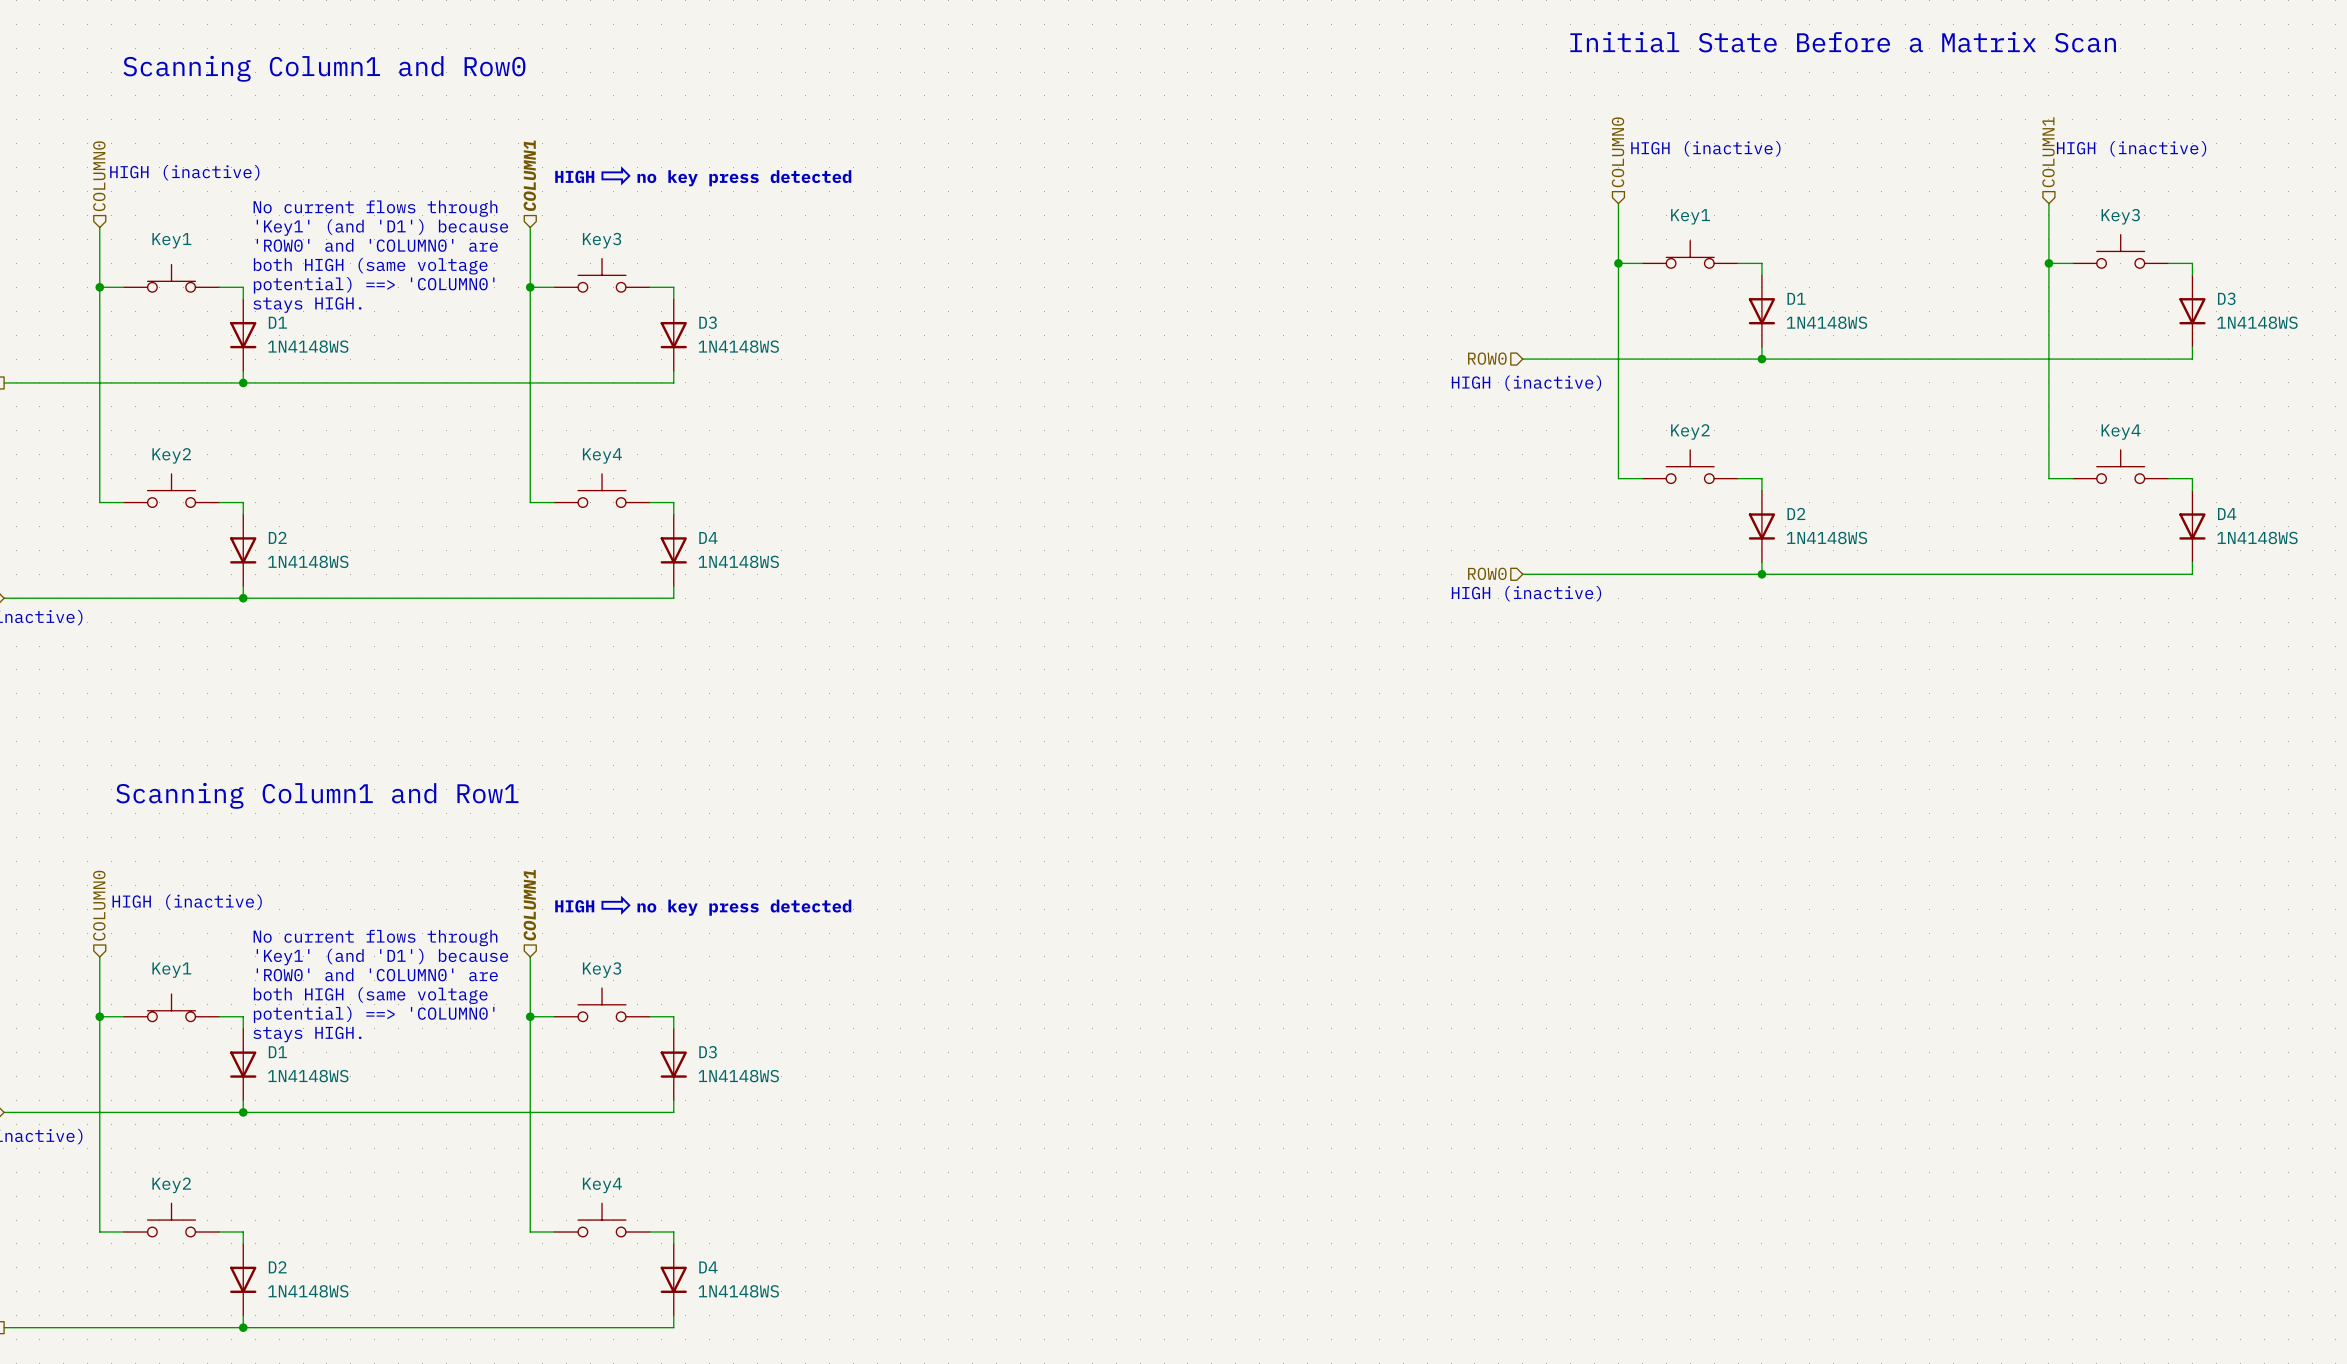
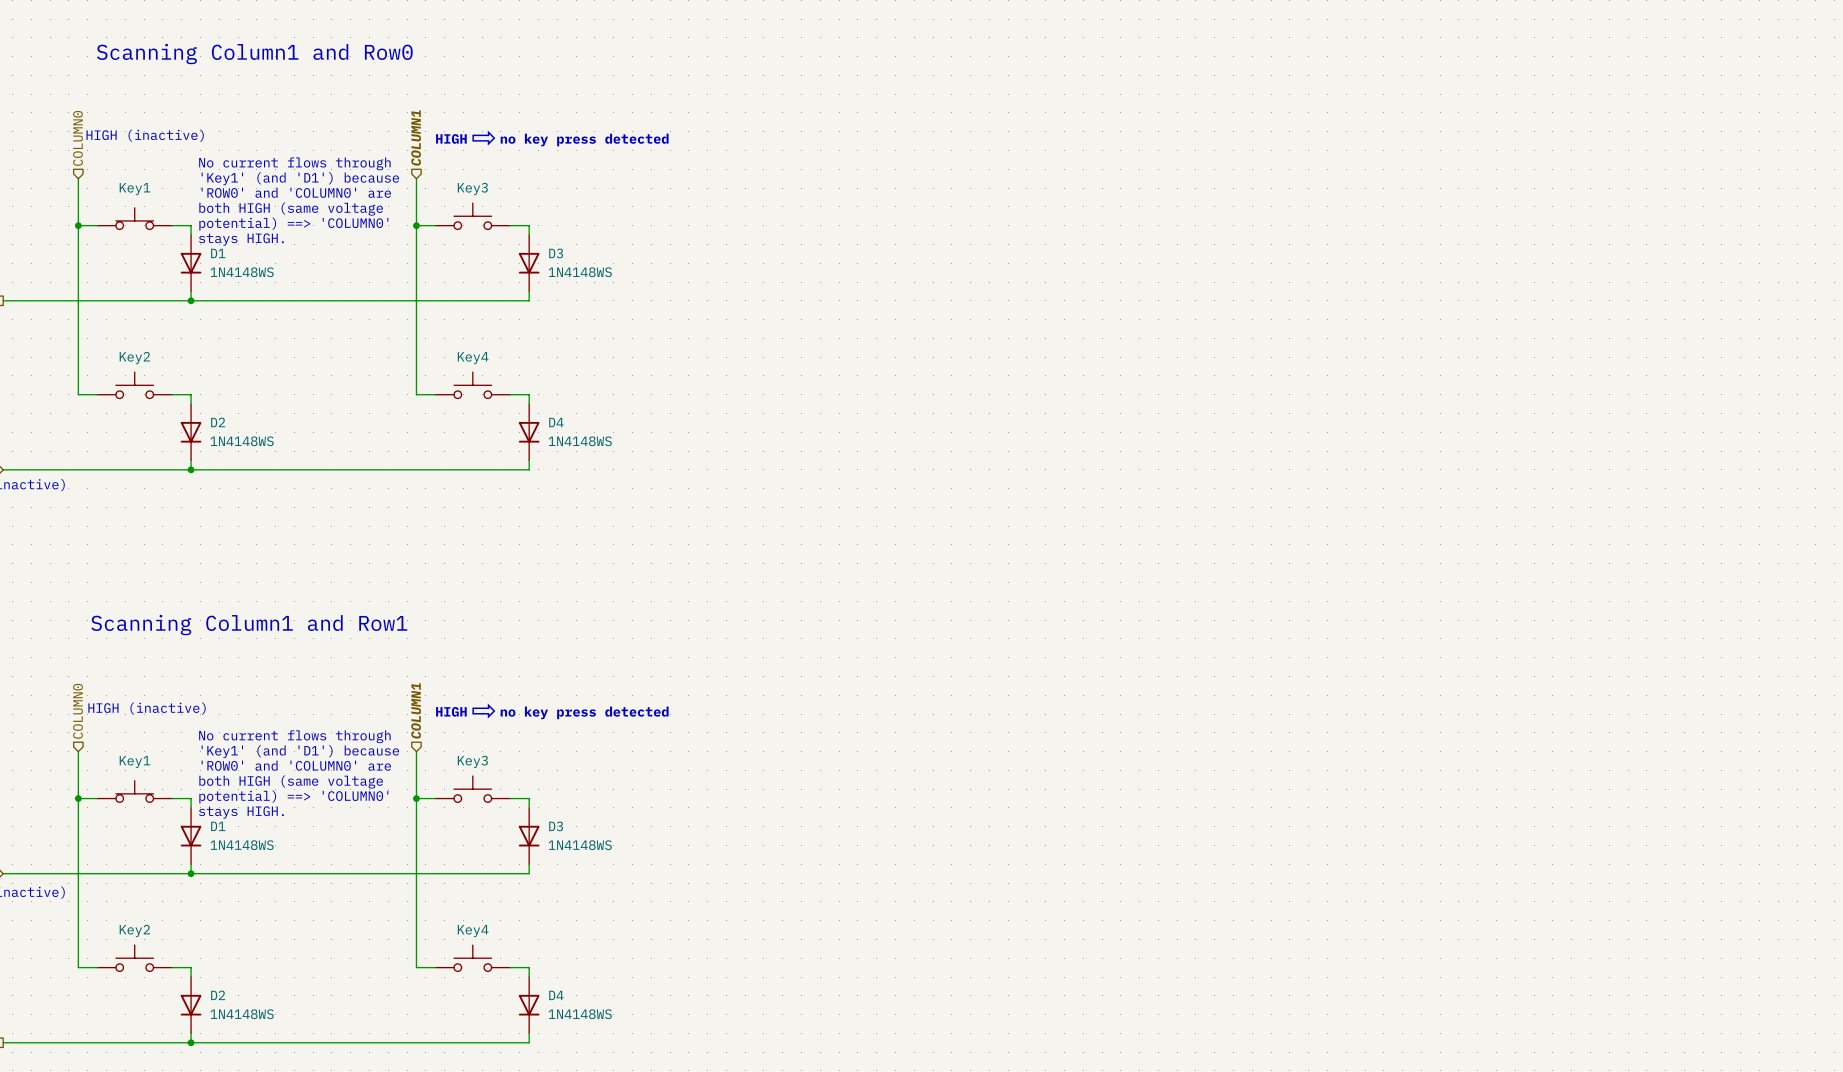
text: Initial State Before a Matrix Scan (1843, 42) -> none
text: HIGH (inactive) (1705, 148) -> none
text: HIGH (inactive) (2131, 148) -> none
hierarchical label: COLUMN0 (1618, 152) -> none
hierarchical label: COLUMN1 (2048, 152) -> none
wire: (1618, 203) (1618, 478) (1642, 478) -> none
wire: (2048, 203) (2048, 478) (2072, 478) -> none
Key3: (2120, 251) -> none
Key1: (1690, 254) -> none
wire: (1618, 263) (1642, 263) -> none
junction: (1618, 263) -> none
wire: (1738, 263) (1761, 263) (1761, 275) -> none
wire: (2048, 263) (2072, 263) -> none
junction: (2048, 263) -> none
wire: (2168, 263) (2192, 263) (2192, 275) -> none
D1: 1N4148WS (1761, 311) -> none
D3: 1N4148WS (2192, 311) -> none
wire: (1761, 347) (1761, 359) -> none
wire: (2192, 347) (2192, 359) (1522, 359) -> none
hierarchical label: ROW0 (1487, 358) -> none
junction: (1761, 359) -> none
text: HIGH (inactive) (1526, 383) -> none
Key2: (1690, 466) -> none
Key4: (2120, 466) -> none
wire: (1738, 478) (1761, 478) (1761, 490) -> none
wire: (2168, 478) (2192, 478) (2192, 490) -> none
D2: 1N4148WS (1761, 526) -> none
D4: 1N4148WS (2192, 526) -> none
wire: (1761, 562) (1761, 574) -> none
wire: (2192, 562) (2192, 574) (1522, 574) -> none
hierarchical label: ROW0 (1487, 573) -> none
junction: (1761, 574) -> none
text: HIGH (inactive) (1526, 593) -> none

